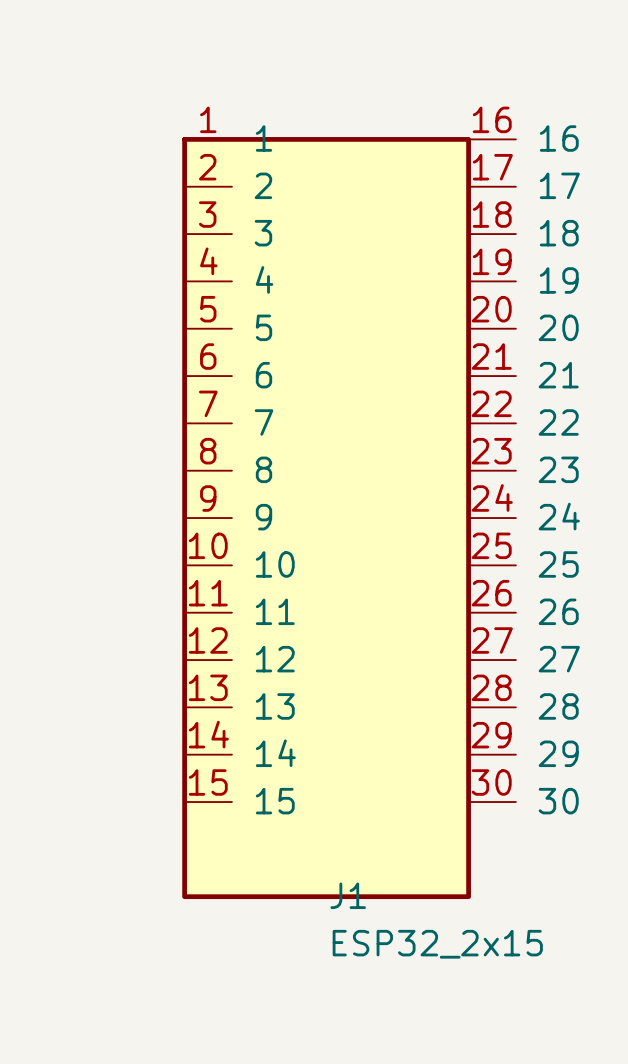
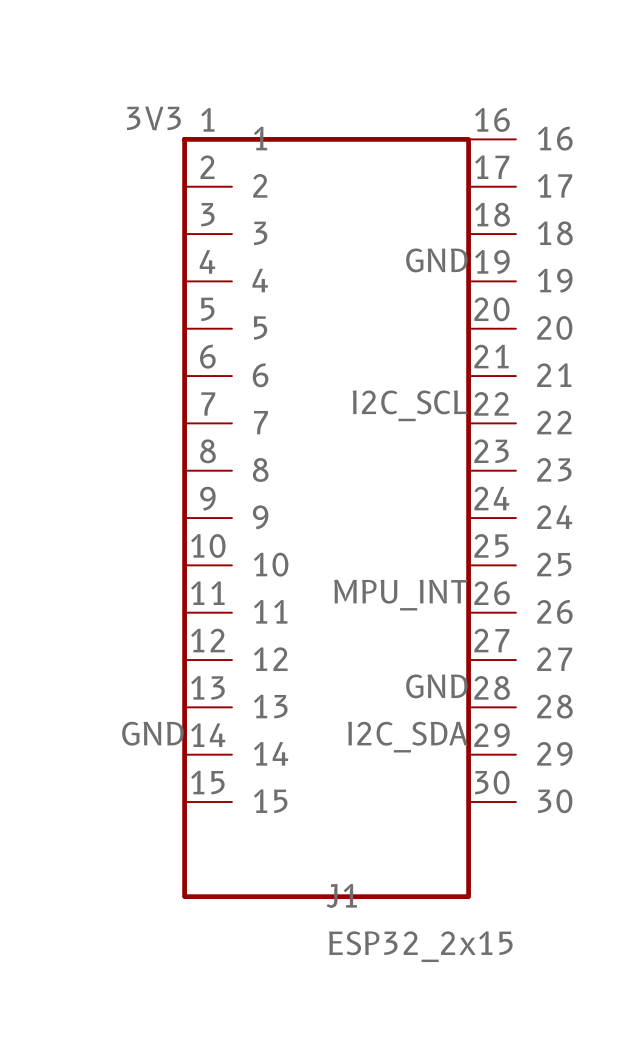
label: none -> 3V3 (153, 118)
label: none -> GND (436, 260)
label: none -> I2C_SCL (410, 405)
label: none -> MPU_INT (400, 595)
label: none -> GND (436, 686)
label: none -> GND (152, 733)
label: none -> I2C_SDA (407, 737)

